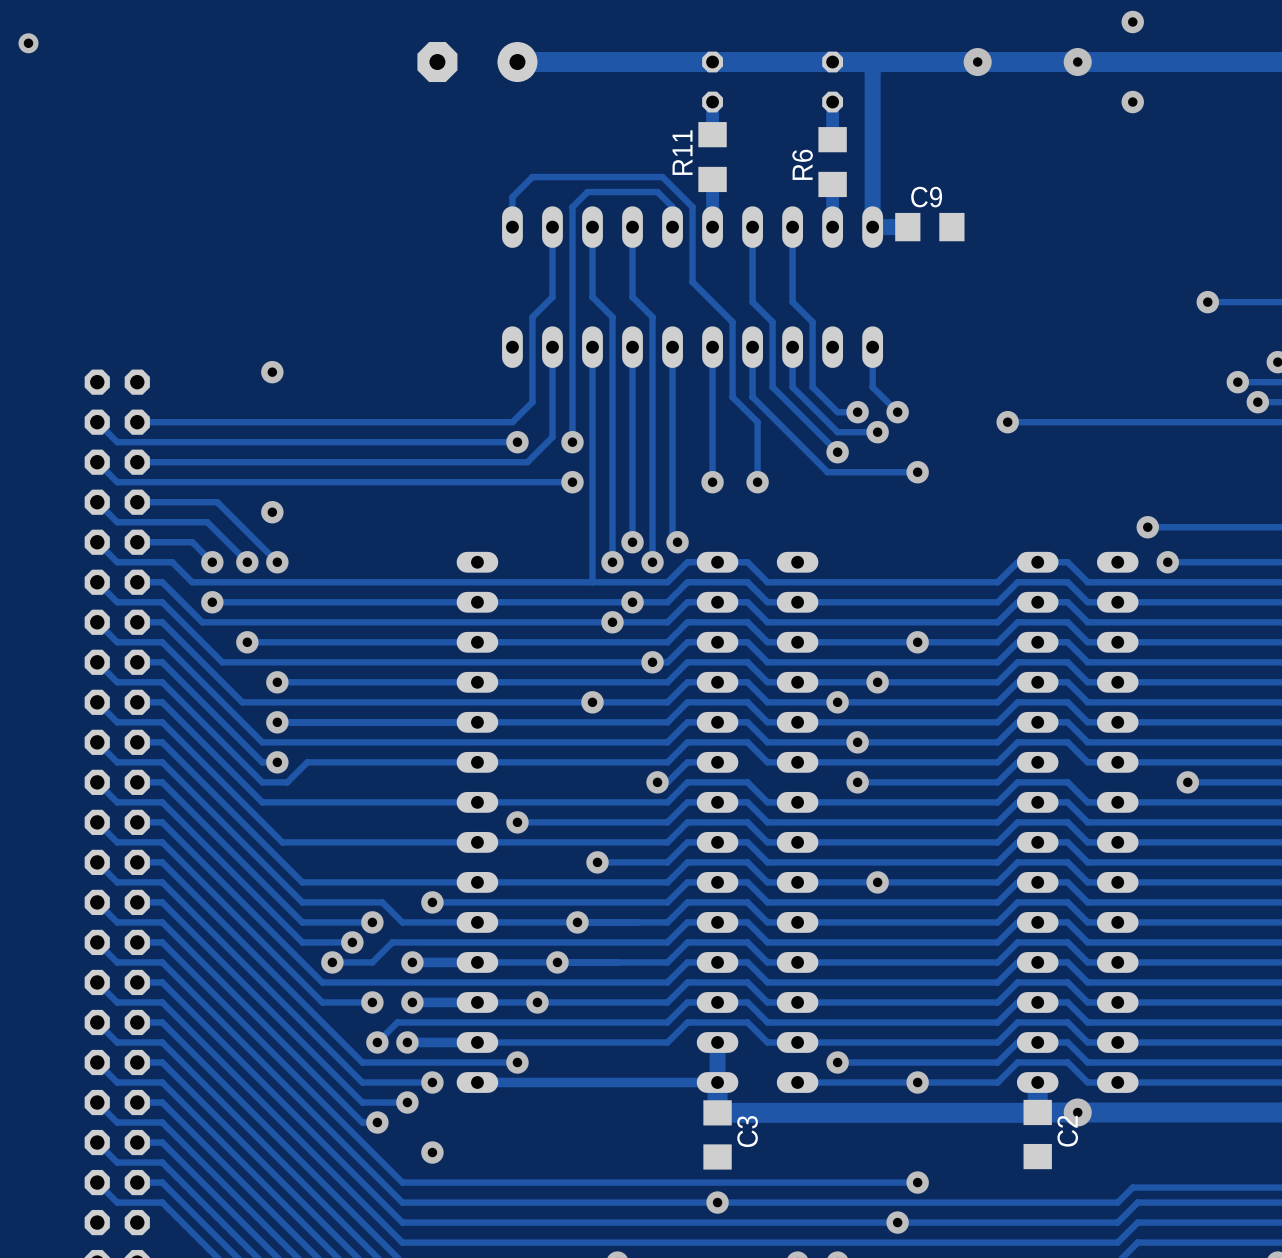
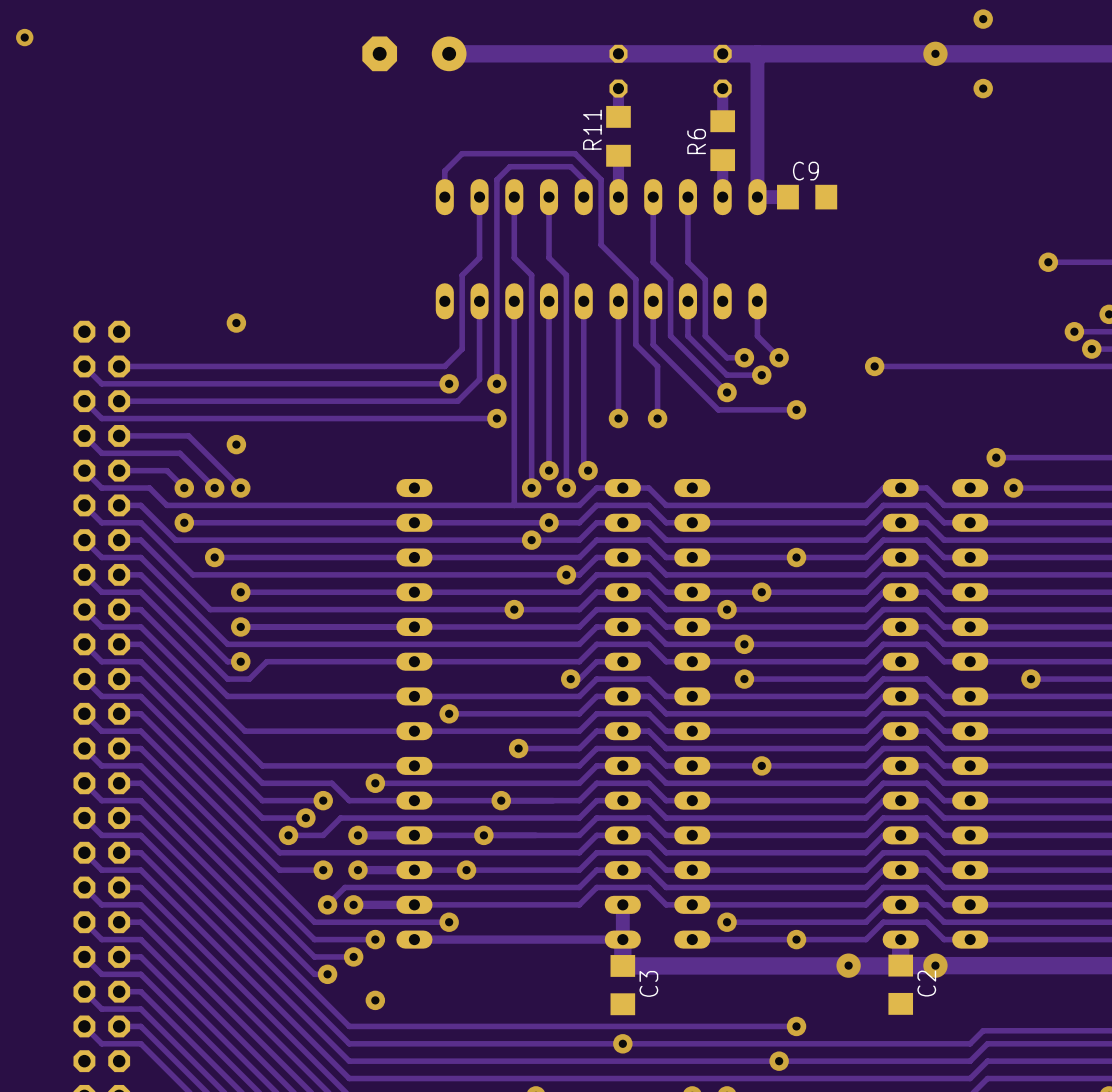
via: (977, 62) -> none
via: none -> (848, 965)

